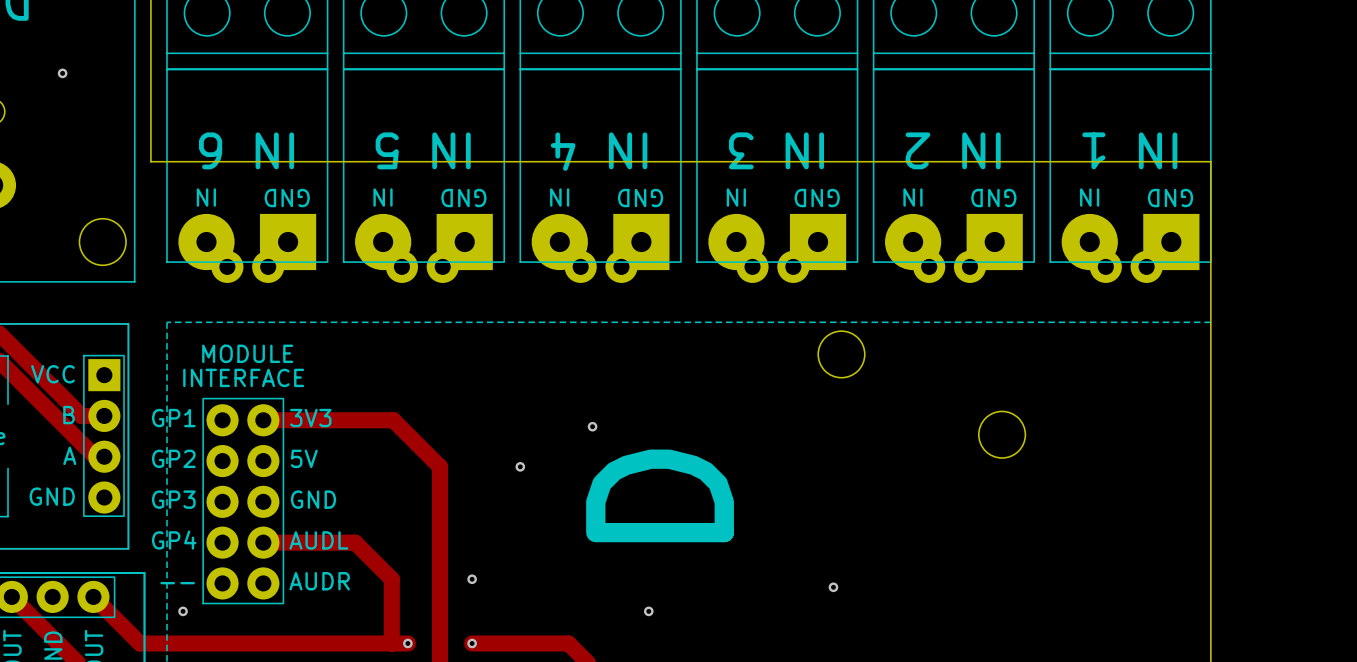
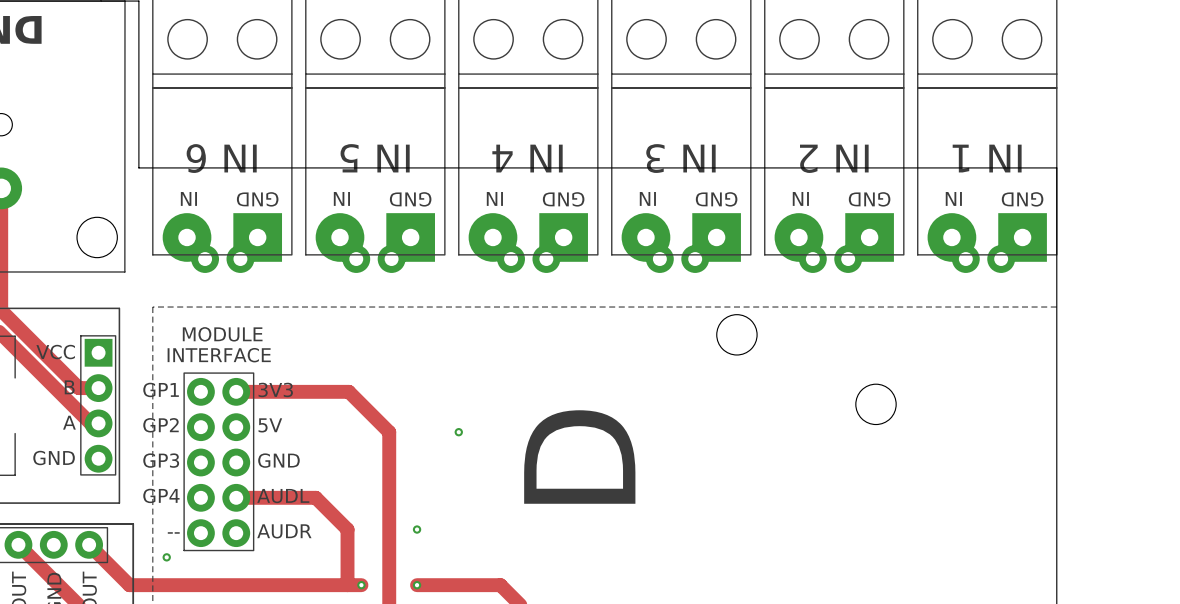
via: (62, 73) -> none
via: (592, 426) -> none
via: (833, 587) -> none
via: (648, 611) -> none

